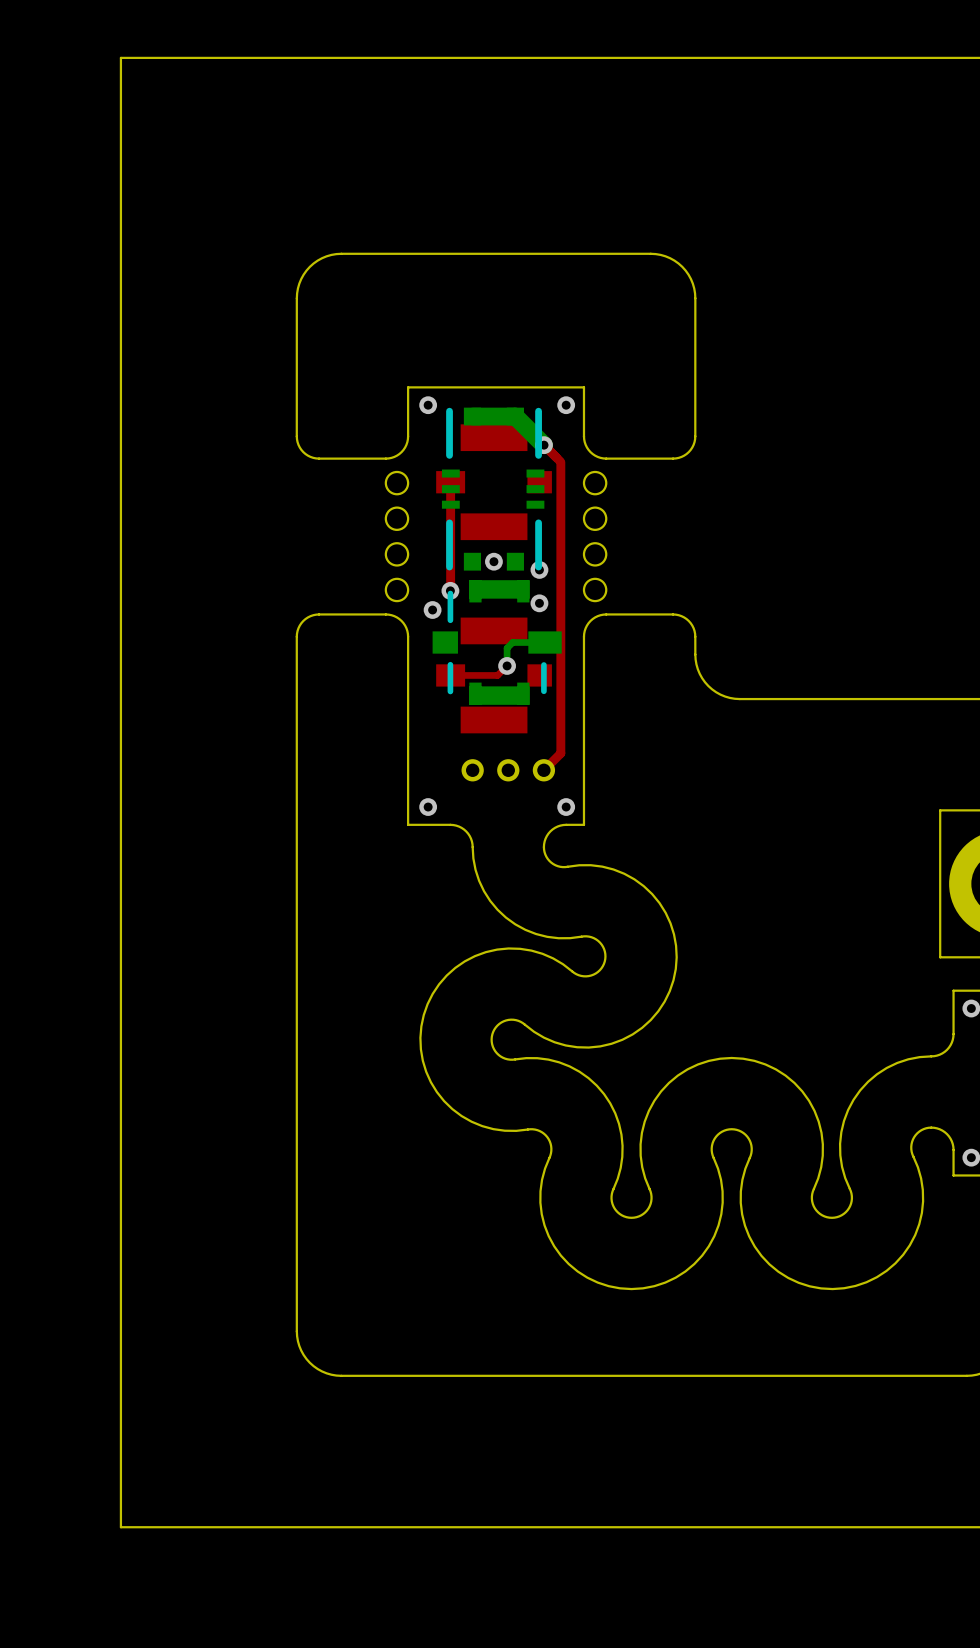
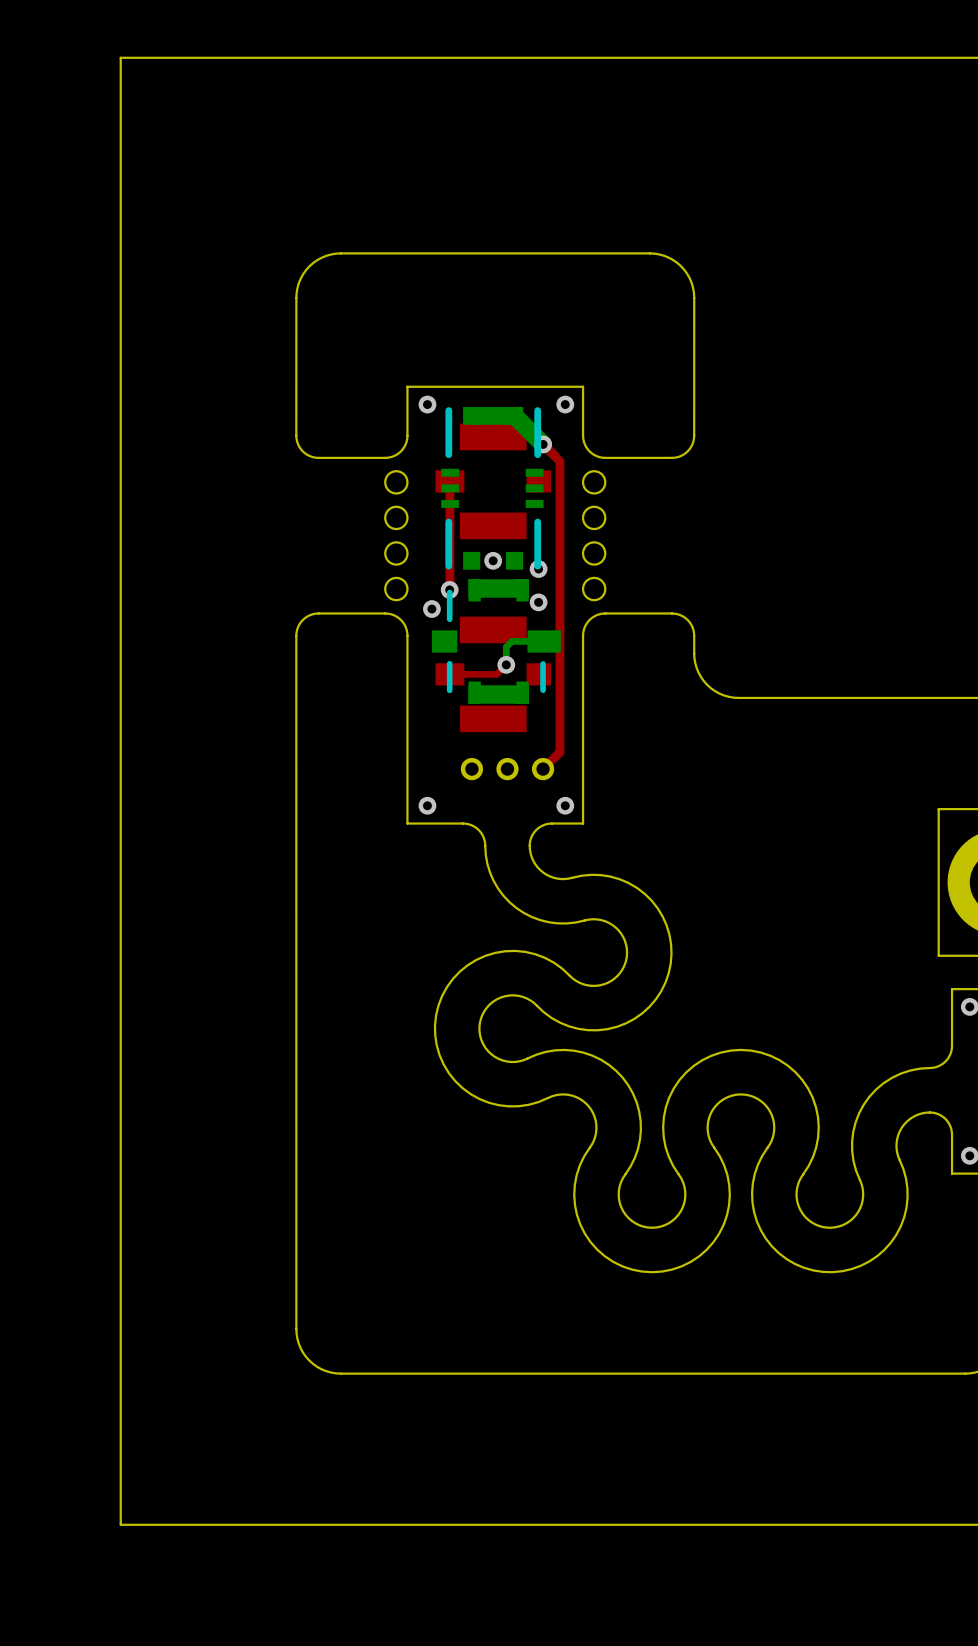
board edge: (450, 824) (461, 827) (469, 835) (479, 880) (490, 900) (505, 917) (525, 929) (547, 936) (591, 937) (600, 942) (604, 951) (604, 961) (601, 968) (595, 973) (586, 976) (576, 974) (553, 958) (531, 950) (497, 949) (475, 956) (455, 967) (439, 984) (427, 1004) (421, 1026) (420, 1049) (426, 1071) (436, 1092) (452, 1109) (482, 1126) (504, 1130) (535, 1129) (543, 1133) (548, 1139) (551, 1150) (542, 1179) (541, 1214) (554, 1246) (577, 1271) (608, 1286) (631, 1289) (665, 1282) (694, 1264) (708, 1246) (721, 1214) (722, 1191) (718, 1168) (712, 1153) (712, 1143) (719, 1133) (731, 1129) (745, 1134) (751, 1145) (751, 1153) (742, 1179) (740, 1202) (744, 1225) (761, 1255) (778, 1271) (798, 1282) (821, 1288) (855, 1285) (886, 1270) (903, 1254) (915, 1235) (923, 1201) (921, 1178) (911, 1149) (915, 1135) (926, 1128) (939, 1129) (948, 1136) (953, 1149) -> (449, 823) (468, 824) (480, 832) (484, 840) (487, 863) (493, 880) (503, 895) (516, 907) (531, 916) (548, 922) (566, 923) (592, 919) (604, 921) (618, 930) (624, 940) (626, 957) (620, 972) (607, 982) (595, 985) (579, 982) (553, 962) (535, 954) (505, 951) (485, 955) (467, 965) (446, 987) (438, 1005) (435, 1025) (439, 1055) (448, 1073) (462, 1088) (479, 1099) (498, 1105) (518, 1106) (563, 1094) (575, 1096) (588, 1106) (595, 1120) (596, 1132) (576, 1174) (574, 1205) (580, 1224) (590, 1242) (613, 1261) (641, 1271) (672, 1269) (690, 1261) (713, 1242) (723, 1224) (729, 1195) (727, 1174) (719, 1156) (710, 1140) (707, 1123) (714, 1107) (720, 1101) (732, 1095) (745, 1094) (757, 1098) (767, 1107) (773, 1118) (773, 1136) (758, 1164) (752, 1183) (752, 1202) (760, 1230) (771, 1246) (786, 1258) (812, 1270) (841, 1271) (860, 1265) (884, 1249) (896, 1234) (904, 1217) (907, 1197) (906, 1178) (898, 1156) (896, 1144) (899, 1131) (906, 1121) (913, 1116) (925, 1112) (940, 1115) (950, 1126) (952, 1148)
board edge: (566, 824) (555, 827) (545, 838) (544, 852) (551, 862) (562, 867) (579, 865) (602, 866) (624, 873) (652, 894) (665, 912) (674, 934) (676, 957) (669, 991) (650, 1020) (632, 1034) (611, 1043) (588, 1047) (565, 1045) (544, 1037) (520, 1021) (510, 1019) (501, 1022) (495, 1027) (491, 1041) (495, 1051) (505, 1058) (537, 1058) (569, 1066) (588, 1078) (604, 1094) (615, 1113) (621, 1134) (620, 1167) (611, 1198) (614, 1208) (621, 1215) (629, 1217) (638, 1216) (645, 1212) (650, 1203) (651, 1193) (642, 1167) (640, 1144) (644, 1121) (654, 1100) (668, 1082) (687, 1069) (708, 1060) (731, 1057) (754, 1060) (775, 1069) (794, 1082) (809, 1100) (818, 1121) (822, 1144) (821, 1167) (812, 1193) (812, 1203) (816, 1210) (824, 1216) (832, 1217) (841, 1215) (849, 1208) (851, 1196) (842, 1166) (840, 1143) (844, 1120) (853, 1099) (868, 1081) (886, 1067) (908, 1059) (942, 1053) (950, 1045) (953, 1034) -> (565, 823) (546, 824) (534, 832) (529, 845) (535, 863) (542, 872) (553, 877) (564, 879) (591, 874) (610, 876) (628, 883) (644, 893) (662, 916) (669, 934) (670, 963) (665, 982) (656, 999) (642, 1013) (626, 1023) (598, 1030) (569, 1026) (551, 1018) (526, 998) (518, 995) (505, 996) (493, 1001) (484, 1010) (479, 1022) (480, 1035) (488, 1051) (502, 1060) (515, 1061) (545, 1051) (573, 1050) (600, 1059) (622, 1077) (636, 1102) (640, 1130) (634, 1157) (619, 1186) (619, 1199) (625, 1214) (635, 1223) (652, 1227) (664, 1225) (678, 1214) (684, 1203) (684, 1186) (668, 1156) (663, 1137) (663, 1117) (673, 1088) (686, 1072) (702, 1060) (720, 1052) (740, 1049) (760, 1052) (779, 1060) (795, 1072) (808, 1088) (818, 1117) (818, 1137) (813, 1156) (797, 1185) (797, 1201) (804, 1216) (818, 1225) (834, 1227) (846, 1223) (858, 1211) (862, 1200) (862, 1187) (853, 1161) (852, 1141) (855, 1122) (863, 1104) (876, 1089) (892, 1077) (910, 1070) (935, 1067) (943, 1063) (951, 1051) (952, 1032)

